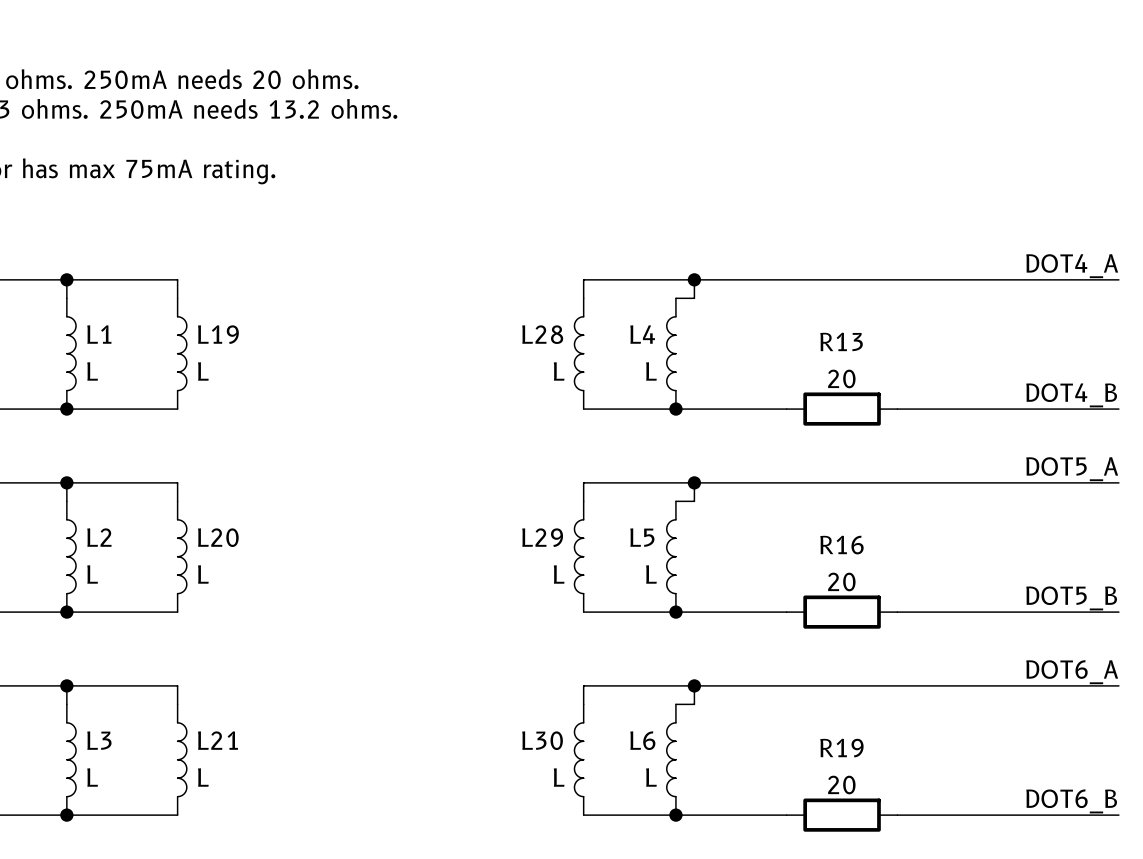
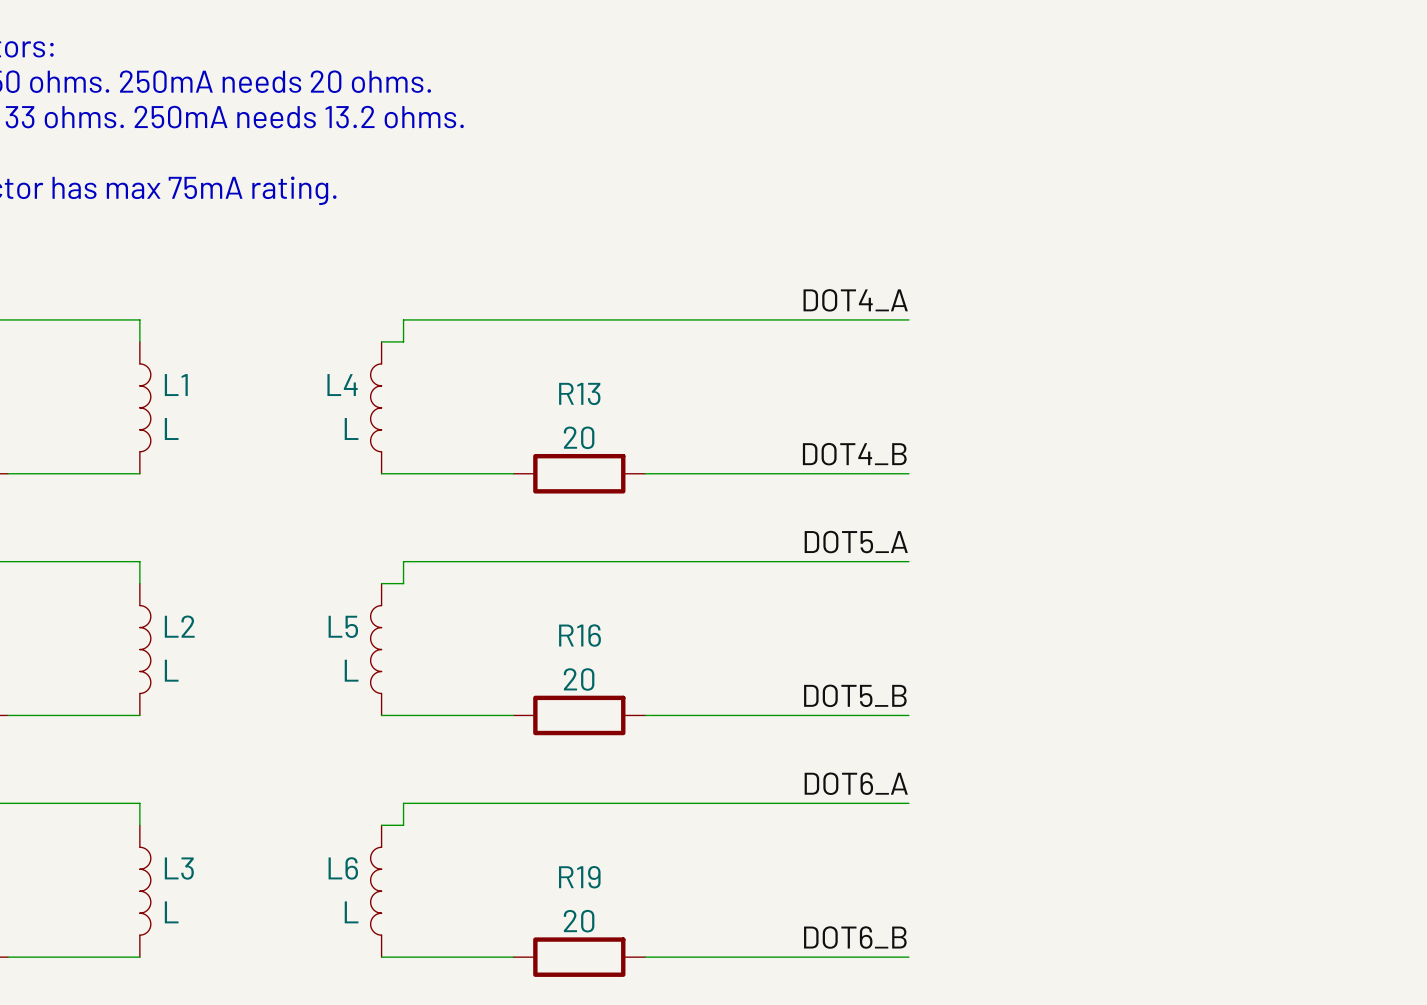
label: none -> DOT4_A (855, 300)
label: DOT4_A (1072, 266) -> none
wire: (66, 279) (177, 279) (177, 298) -> none
junction: (66, 279) -> none
wire: (583, 279) (583, 298) -> (755, 319) (403, 319) (403, 341) (381, 341)
wire: (694, 279) (694, 298) (675, 298) -> none
junction: (694, 279) -> none
wire: (712, 279) (1118, 279) -> none
L19: L (182, 353) -> none
L28: L (579, 353) -> none
L4 position: (671, 353) -> (376, 407)
label: none -> DOT4_B (854, 454)
label: DOT4_B (1071, 395) -> none
wire: (66, 409) (177, 409) -> (381, 473) (513, 473)
junction: (66, 409) -> none
wire: none -> (645, 473) (755, 473)
junction: (675, 409) -> none
wire: (712, 409) (786, 409) -> none
R13 position: (842, 409) -> (579, 473)
wire: (897, 409) (1118, 409) -> none
label: none -> DOT5_A (856, 542)
label: DOT5_A (1072, 469) -> none
wire: (66, 482) (177, 482) (177, 501) -> none
junction: (66, 482) -> none
wire: (583, 482) (583, 501) -> (755, 561) (403, 561) (403, 583) (381, 583)
wire: (694, 482) (694, 501) (675, 501) -> none
junction: (694, 482) -> none
wire: (712, 482) (1118, 482) -> none
L20: L (182, 556) -> none
L29: L (579, 556) -> none
L5 position: (671, 556) -> (376, 649)
label: none -> DOT5_B (855, 695)
label: DOT5_B (1071, 598) -> none
wire: (66, 612) (177, 612) -> (381, 715) (513, 715)
junction: (66, 612) -> none
wire: none -> (645, 715) (755, 715)
junction: (675, 612) -> none
wire: (712, 612) (786, 612) -> none
R16 position: (842, 612) -> (579, 715)
wire: (897, 612) (1118, 612) -> none
label: none -> DOT6_A (856, 783)
label: DOT6_A (1072, 672) -> none
wire: (66, 685) (177, 685) (177, 704) -> none
junction: (66, 685) -> none
wire: (583, 685) (583, 704) -> (755, 803) (403, 803) (403, 825) (381, 825)
wire: (694, 685) (694, 704) (675, 704) -> none
junction: (694, 685) -> none
wire: (712, 685) (1118, 685) -> none
L21: L (182, 759) -> none
L30: L (579, 759) -> none
L6 position: (671, 759) -> (376, 891)
label: none -> DOT6_B (855, 937)
label: DOT6_B (1071, 801) -> none
wire: (66, 815) (177, 815) -> (381, 957) (513, 957)
junction: (66, 815) -> none
wire: none -> (645, 957) (755, 957)
junction: (675, 815) -> none
wire: (712, 815) (786, 815) -> none
R19 position: (842, 815) -> (579, 957)
wire: (897, 815) (1118, 815) -> none

